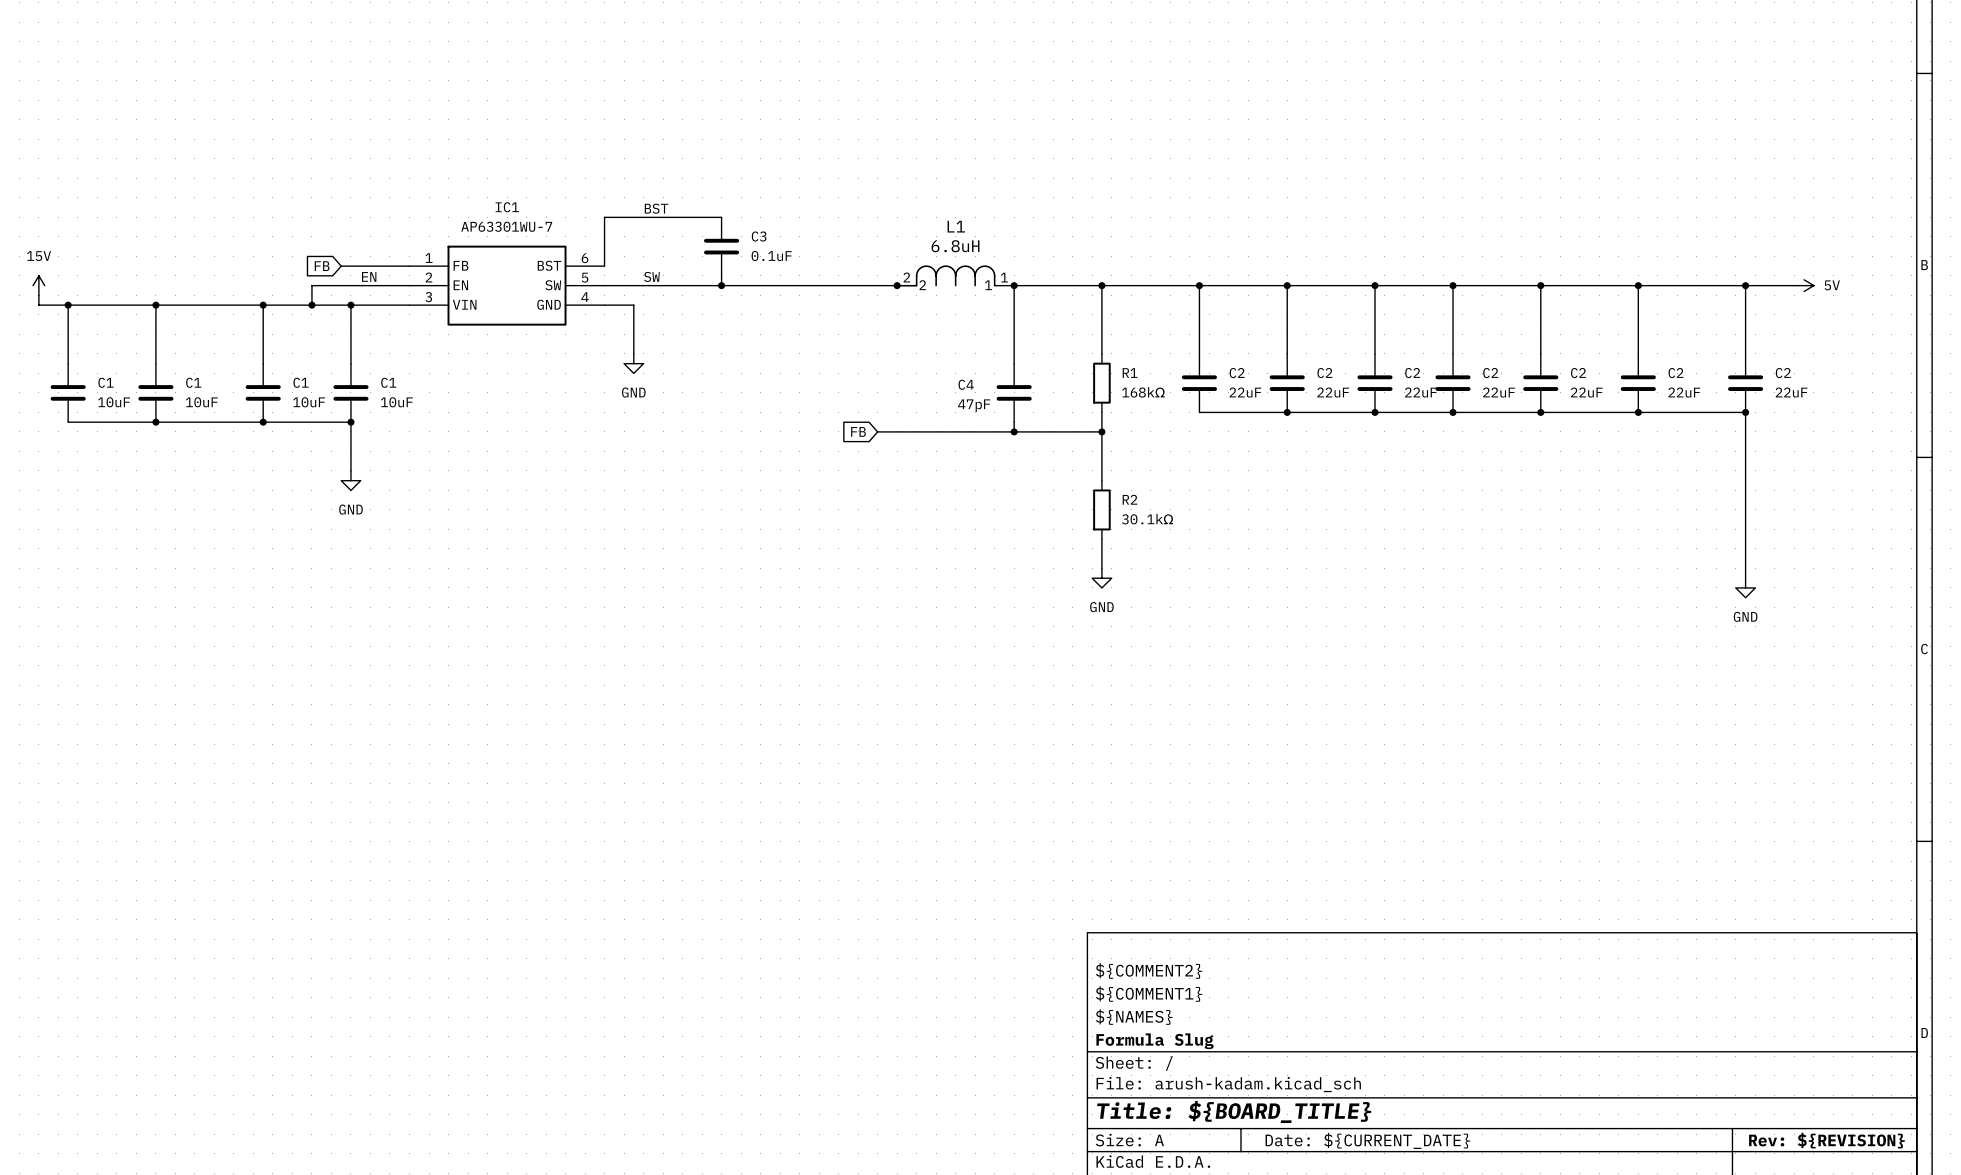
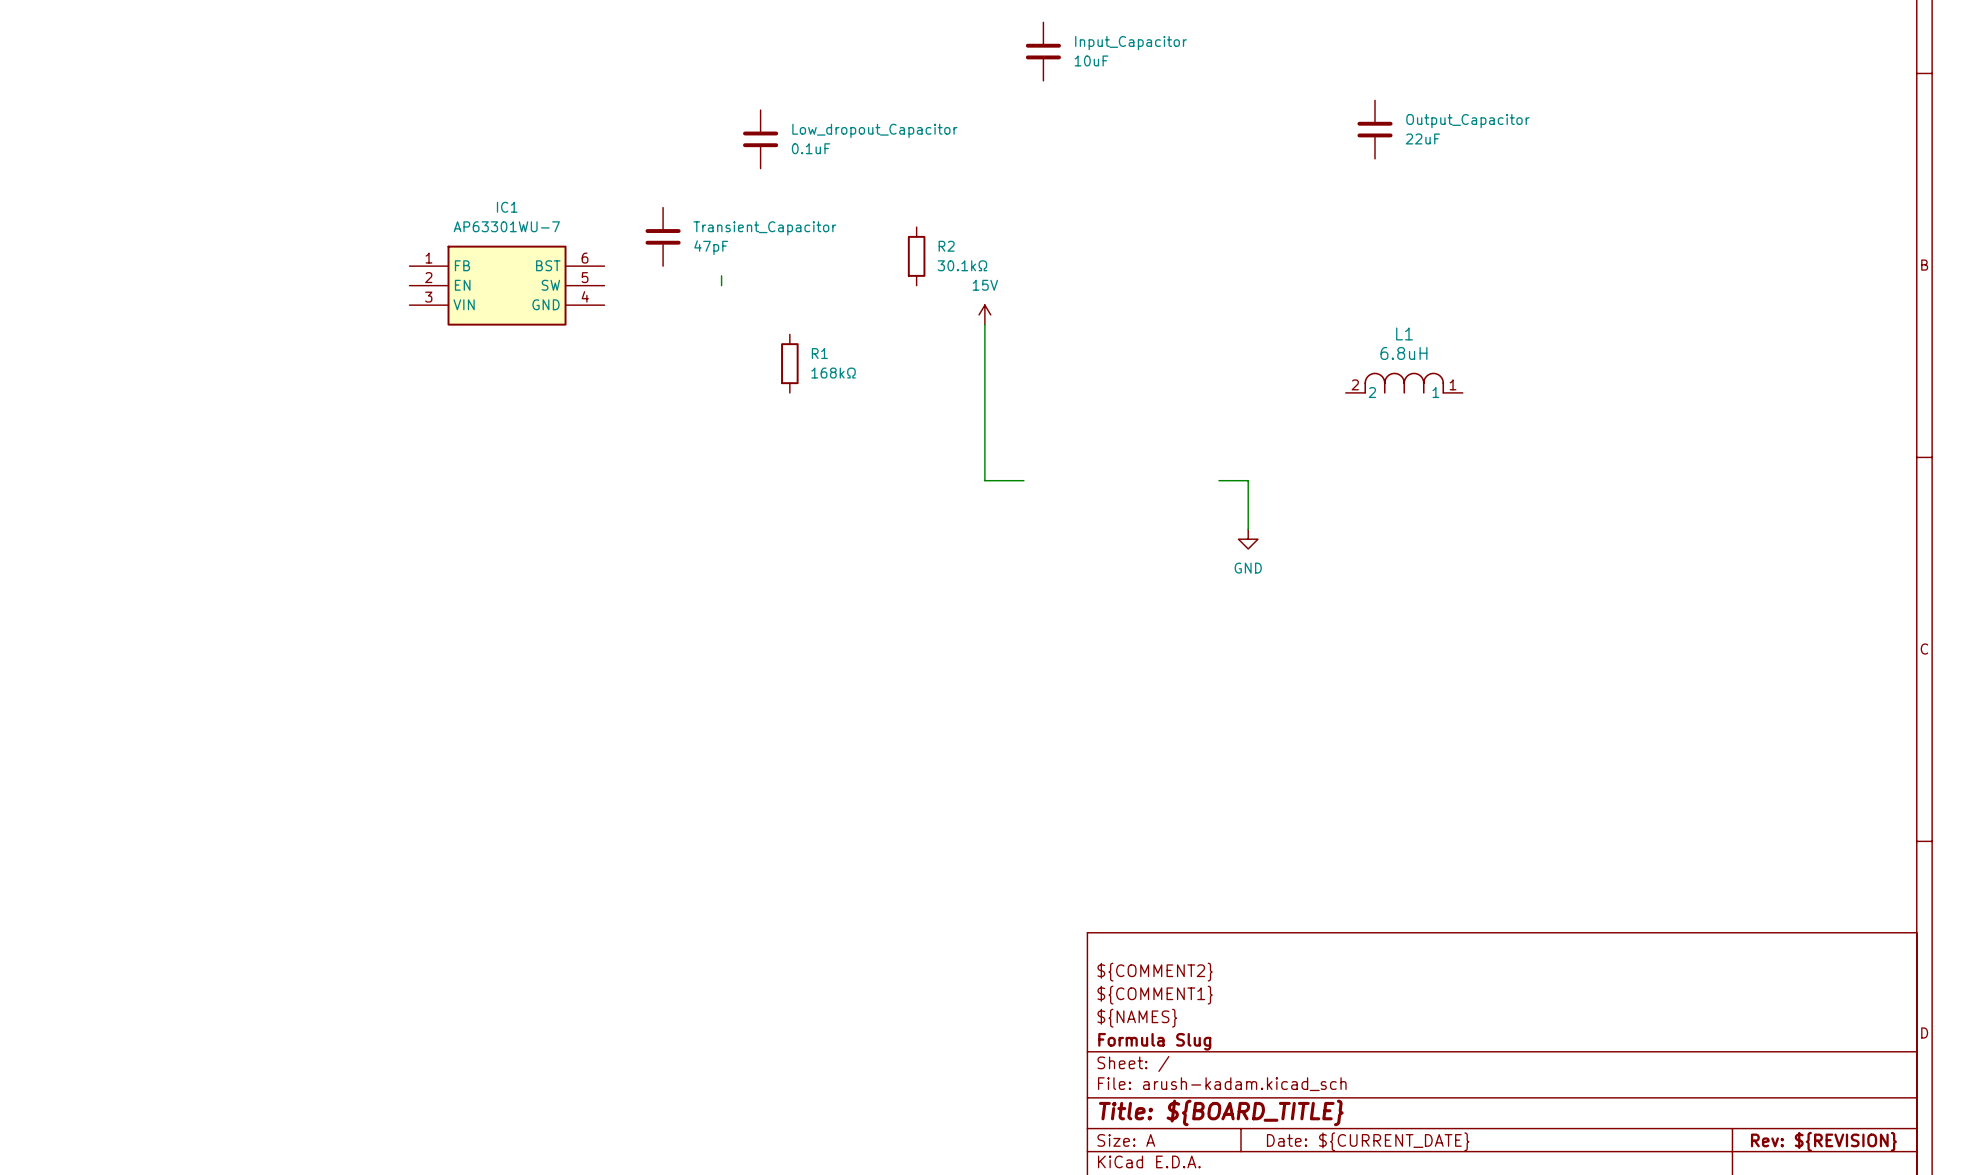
Input_Capacitor: none -> 10uF (1043, 51)
Output_Capacitor: none -> 22uF (1374, 129)
Low_dropout_Capacitor: none -> 0.1uF (760, 139)
label: BST (656, 208) -> none
wire: (721, 217) (604, 217) (604, 266) -> none
Transient_Capacitor: none -> 47pF (663, 236)
C3: 0.1uF (721, 246) -> none
global label: FB (322, 266) -> none
wire: (341, 266) (409, 266) -> none
L1 position: (955, 275) -> (1404, 383)
label: EN (369, 276) -> none
label: SW (652, 276) -> none
power symbol: 15V (38, 285) -> none
wire: (409, 285) (311, 285) (311, 305) -> none
wire: (604, 285) (916, 285) -> none
junction: (721, 285) -> none
junction: (897, 285) -> none
junction: (1014, 285) -> none
wire: (1101, 285) (1101, 353) -> none
junction: (1101, 285) -> none
wire: (1199, 285) (1199, 353) -> none
junction: (1199, 285) -> none
wire: (1287, 285) (1287, 353) -> none
junction: (1287, 285) -> none
wire: (1374, 285) (1374, 353) -> none
junction: (1374, 285) -> none
wire: (1453, 285) (1453, 353) -> none
junction: (1453, 285) -> none
wire: (1540, 285) (1540, 353) -> none
junction: (1540, 285) -> none
wire: (1638, 285) (1638, 353) -> none
junction: (1638, 285) -> none
wire: (1745, 285) (1745, 353) -> none
junction: (1745, 285) -> none
wire: (1794, 285) (1014, 285) (1014, 363) -> none
power symbol: 5V (1804, 285) -> none
wire: (38, 295) (38, 305) (409, 305) -> none
wire: (68, 305) (68, 363) -> none
junction: (68, 305) -> none
wire: (155, 305) (155, 363) -> none
junction: (155, 305) -> none
wire: (263, 305) (263, 363) -> none
junction: (263, 305) -> none
junction: (311, 305) -> none
wire: (350, 305) (350, 363) -> none
junction: (350, 305) -> none
wire: (604, 305) (633, 305) (633, 353) -> none
power symbol: none -> 15V (984, 314)
wire: none -> (984, 324) (984, 480) (1023, 480)
power symbol: GND (633, 363) -> none
R1 position: (1101, 383) -> (789, 363)
C2: 22uF (1199, 383) -> none
C2: 22uF (1287, 383) -> none
C2: 22uF (1374, 383) -> none
C2: 22uF (1453, 383) -> none
C2: 22uF (1540, 383) -> none
C2: 22uF (1638, 383) -> none
C2: 22uF (1745, 383) -> none
C1: 10uF (68, 392) -> none
C1: 10uF (155, 392) -> none
C1: 10uF (263, 392) -> none
C1: 10uF (350, 392) -> none
C4: 47pF (1014, 392) -> none
wire: (1101, 412) (1101, 480) -> none
wire: (1199, 412) (1745, 412) (1745, 578) -> none
junction: (1287, 412) -> none
junction: (1374, 412) -> none
junction: (1453, 412) -> none
junction: (1540, 412) -> none
junction: (1638, 412) -> none
junction: (1745, 412) -> none
wire: (68, 422) (350, 422) (350, 470) -> none
junction: (155, 422) -> none
junction: (263, 422) -> none
junction: (350, 422) -> none
wire: (1014, 422) (1014, 431) -> none
global label: FB (858, 431) -> none
wire: (877, 431) (1101, 431) -> none
junction: (1014, 431) -> none
junction: (1101, 431) -> none
power symbol: GND (350, 480) -> none
wire: none -> (1218, 480) (1248, 480) (1248, 529)
R2 position: (1101, 509) -> (916, 256)
wire: (1101, 539) (1101, 568) -> none
power symbol position: GND (1101, 578) -> GND (1248, 539)
power symbol: GND (1745, 587) -> none

